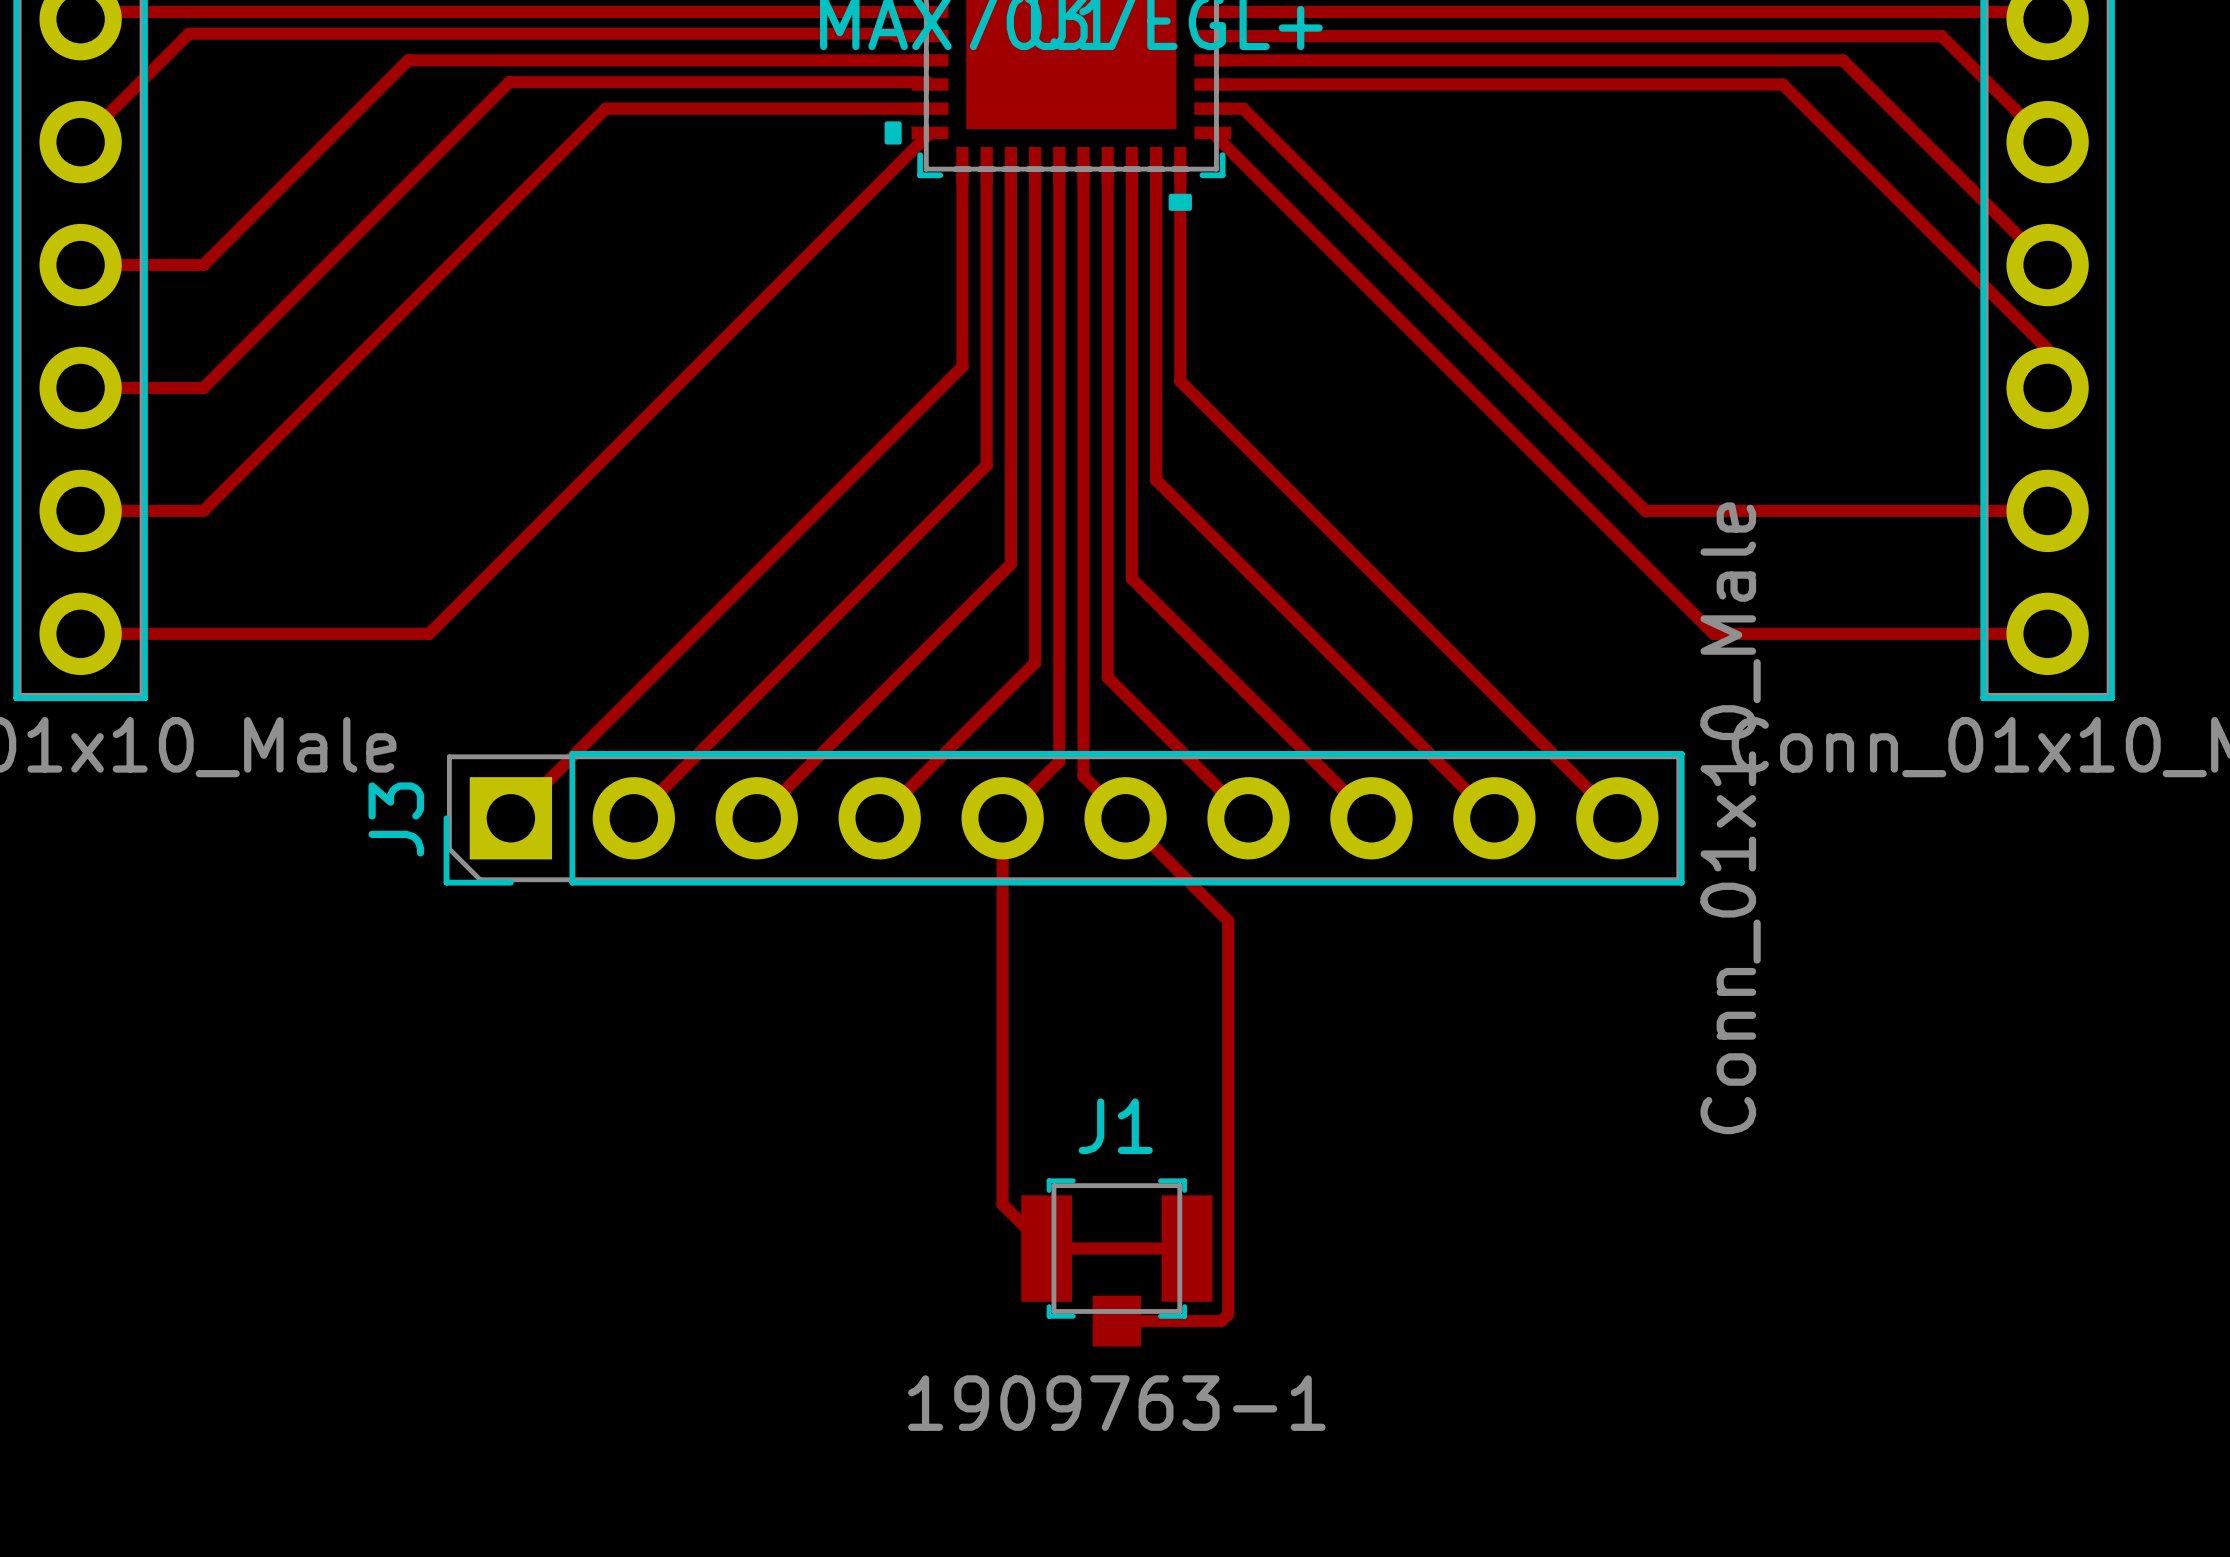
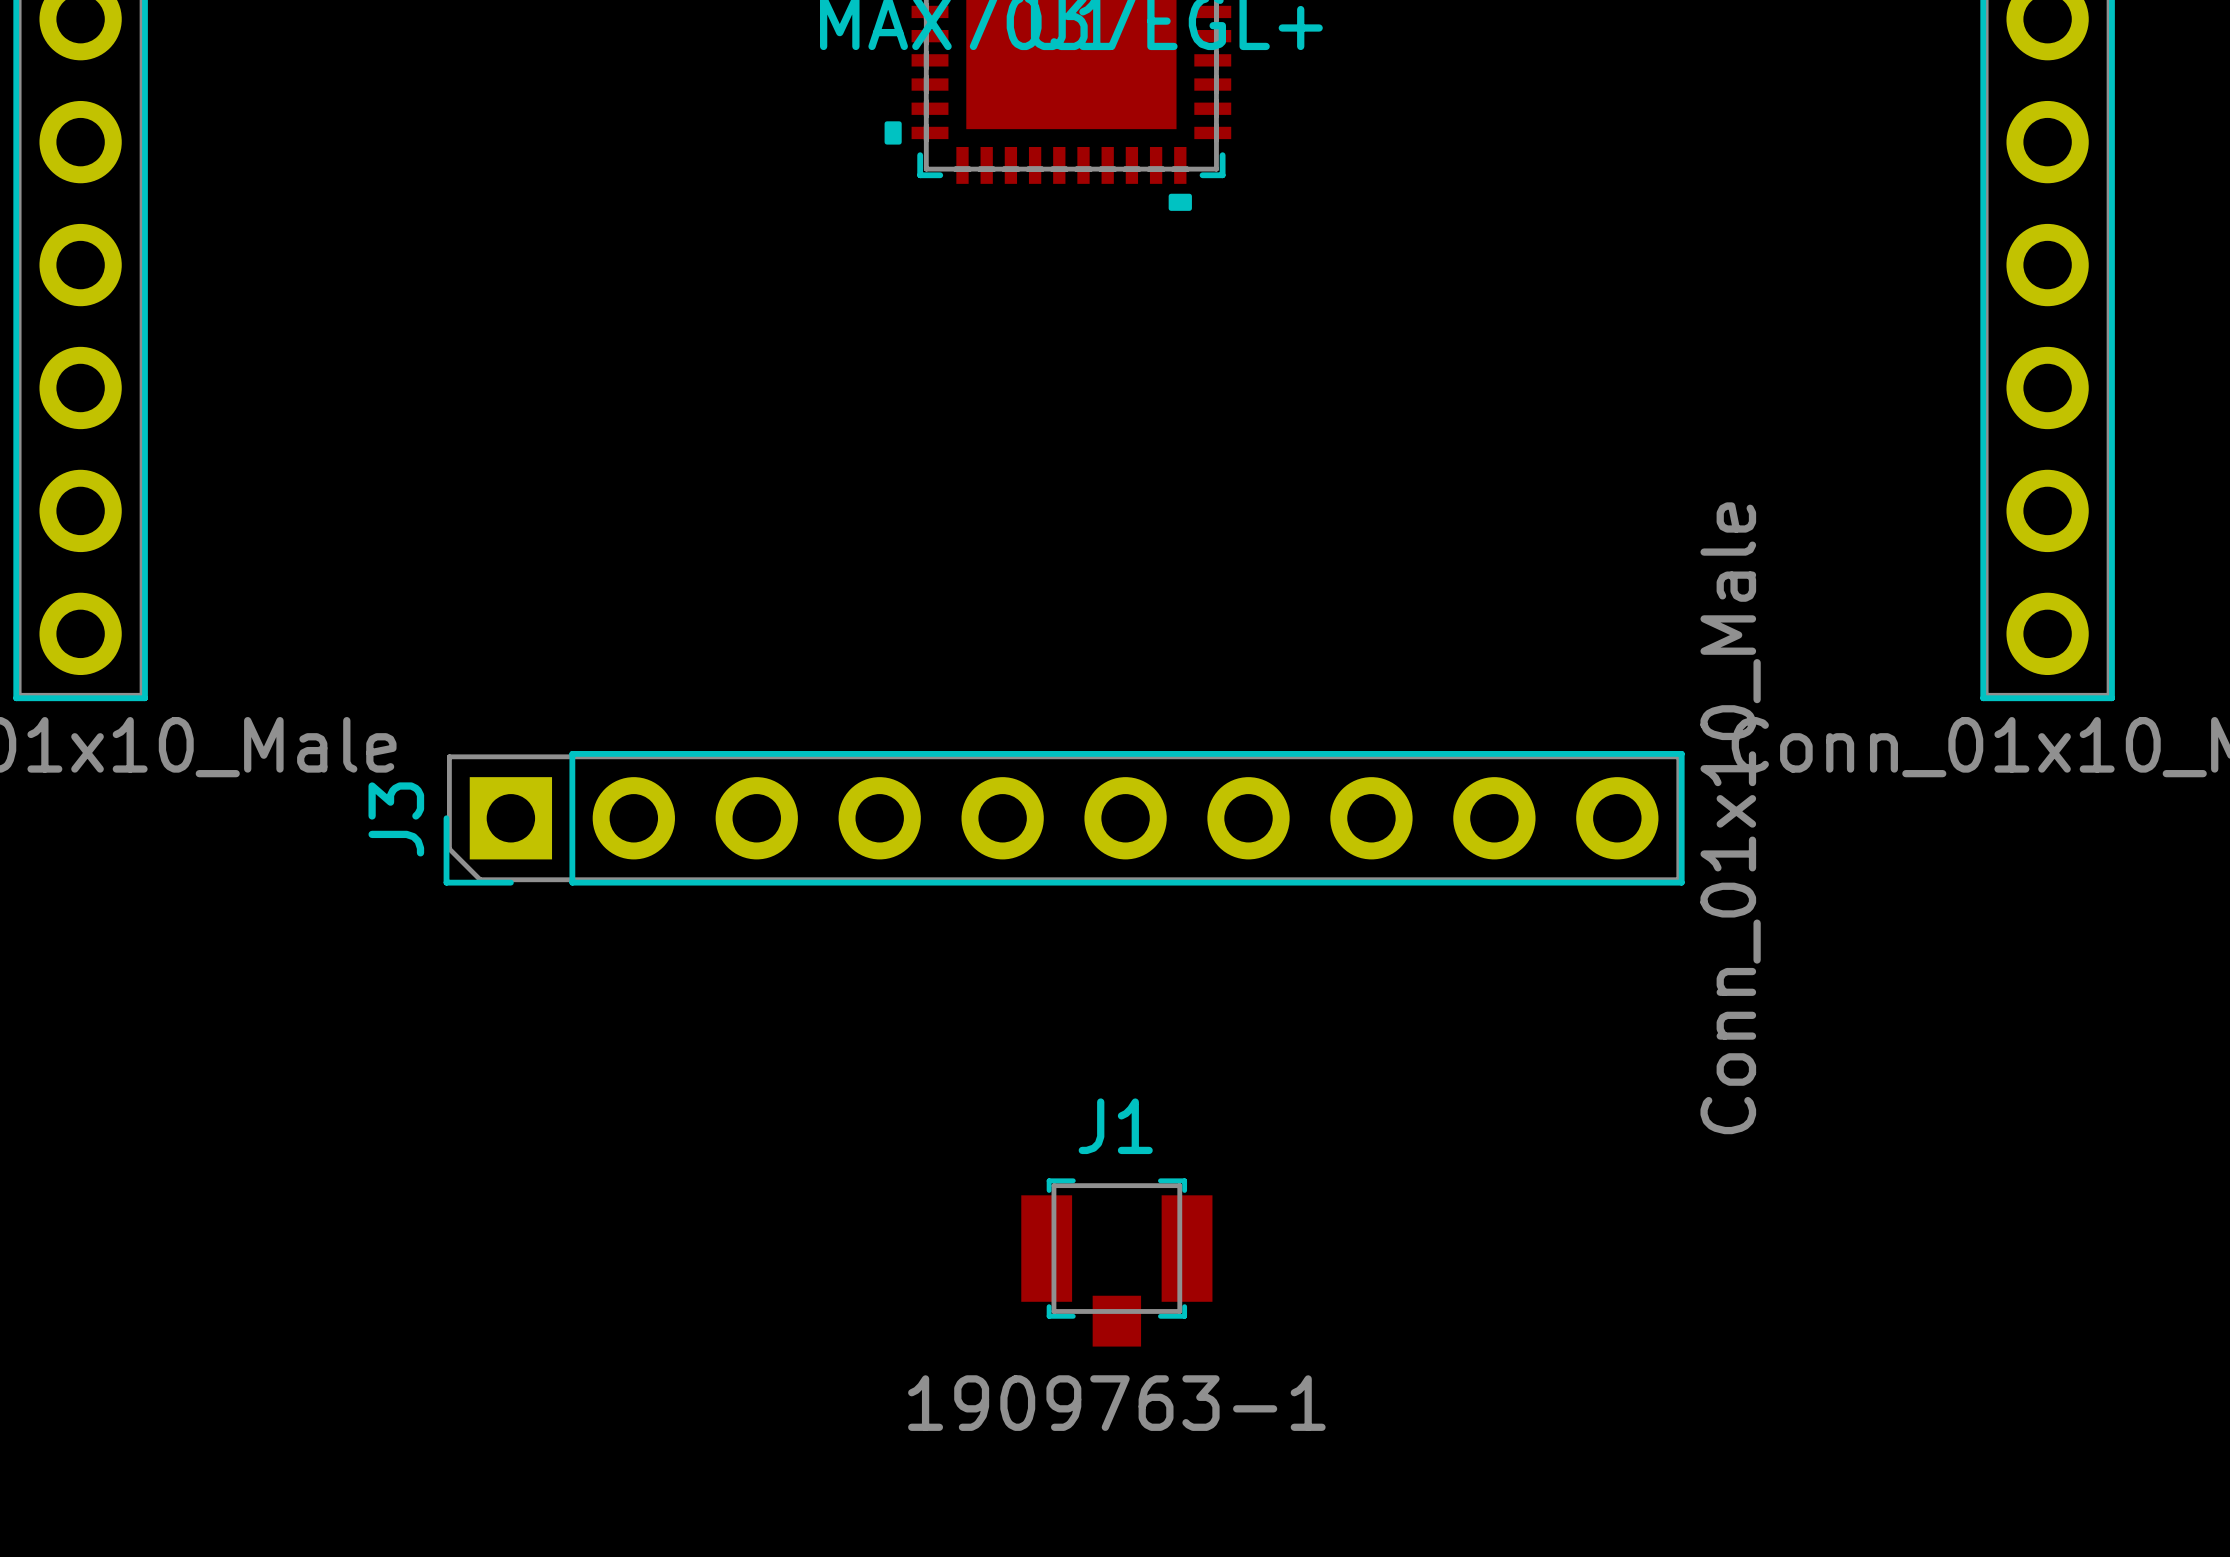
top track: (930, 11) (87, 11) (80, 19) -> none
top track: (1212, 11) (2040, 11) (2047, 19) -> none
top track: (930, 36) (896, 36) (894, 33) (188, 33) (80, 142) -> none
top track: (1212, 36) (1941, 36) (2047, 142) -> none
top track: (930, 60) (408, 60) (203, 265) (80, 265) -> none
top track: (1212, 60) (1842, 60) (2047, 265) -> none
top track: (930, 84) (927, 82) (509, 82) (203, 387) (80, 387) -> none
top track: (1212, 84) (1782, 84) (2047, 349) (2047, 387) -> none
top track: (930, 108) (605, 108) (203, 510) (80, 510) -> none
top track: (1212, 108) (1243, 108) (1645, 510) (2047, 510) -> none
top track: (930, 132) (429, 633) (80, 633) -> none
top track: (1212, 132) (1713, 633) (2047, 633) -> none
top track: (962, 165) (962, 366) (510, 818) -> none
top track: (986, 165) (986, 465) (633, 818) -> none
top track: (1010, 165) (1010, 564) (756, 818) -> none
top track: (1035, 165) (1035, 662) (879, 818) -> none
top track: (1059, 165) (1059, 761) (1002, 818) (1002, 1204) (1046, 1248) (1187, 1248) -> none
top track: (1083, 165) (1083, 776) (1228, 920) (1228, 1314) (1221, 1321) (1116, 1321) -> none
top track: (1107, 165) (1107, 677) (1248, 818) -> none
top track: (1131, 165) (1131, 578) (1371, 818) -> none
top track: (1156, 165) (1156, 479) (1494, 818) -> none
top track: (1180, 165) (1180, 381) (1617, 818) -> none

